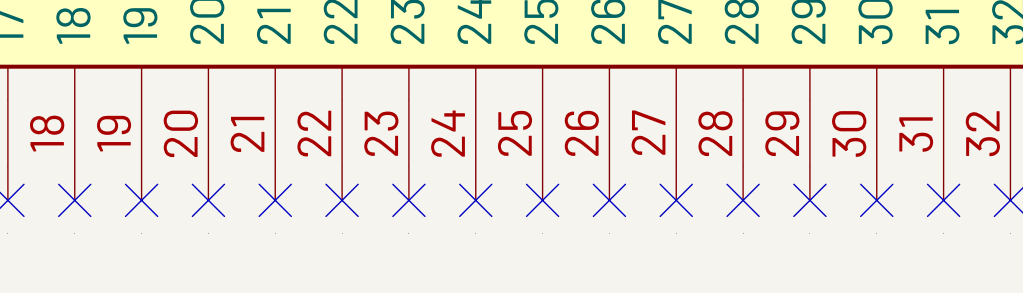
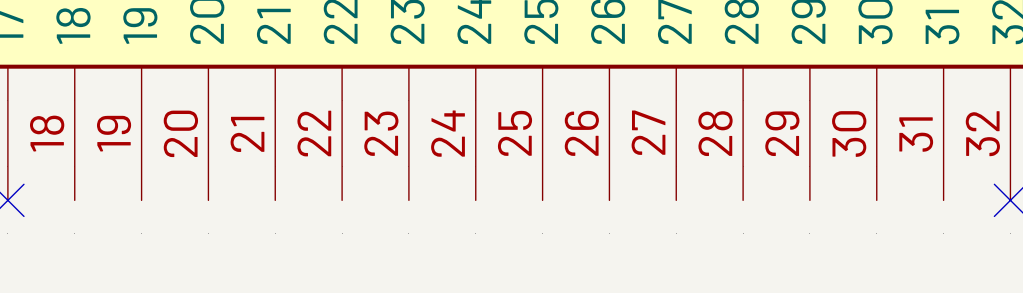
no-connect mark: (74, 200) -> none
no-connect mark: (141, 200) -> none
no-connect mark: (208, 200) -> none
no-connect mark: (275, 200) -> none
no-connect mark: (342, 200) -> none
no-connect mark: (408, 200) -> none
no-connect mark: (475, 200) -> none
no-connect mark: (542, 200) -> none
no-connect mark: (609, 200) -> none
no-connect mark: (676, 200) -> none
no-connect mark: (743, 200) -> none
no-connect mark: (809, 200) -> none
no-connect mark: (876, 200) -> none
no-connect mark: (943, 200) -> none

